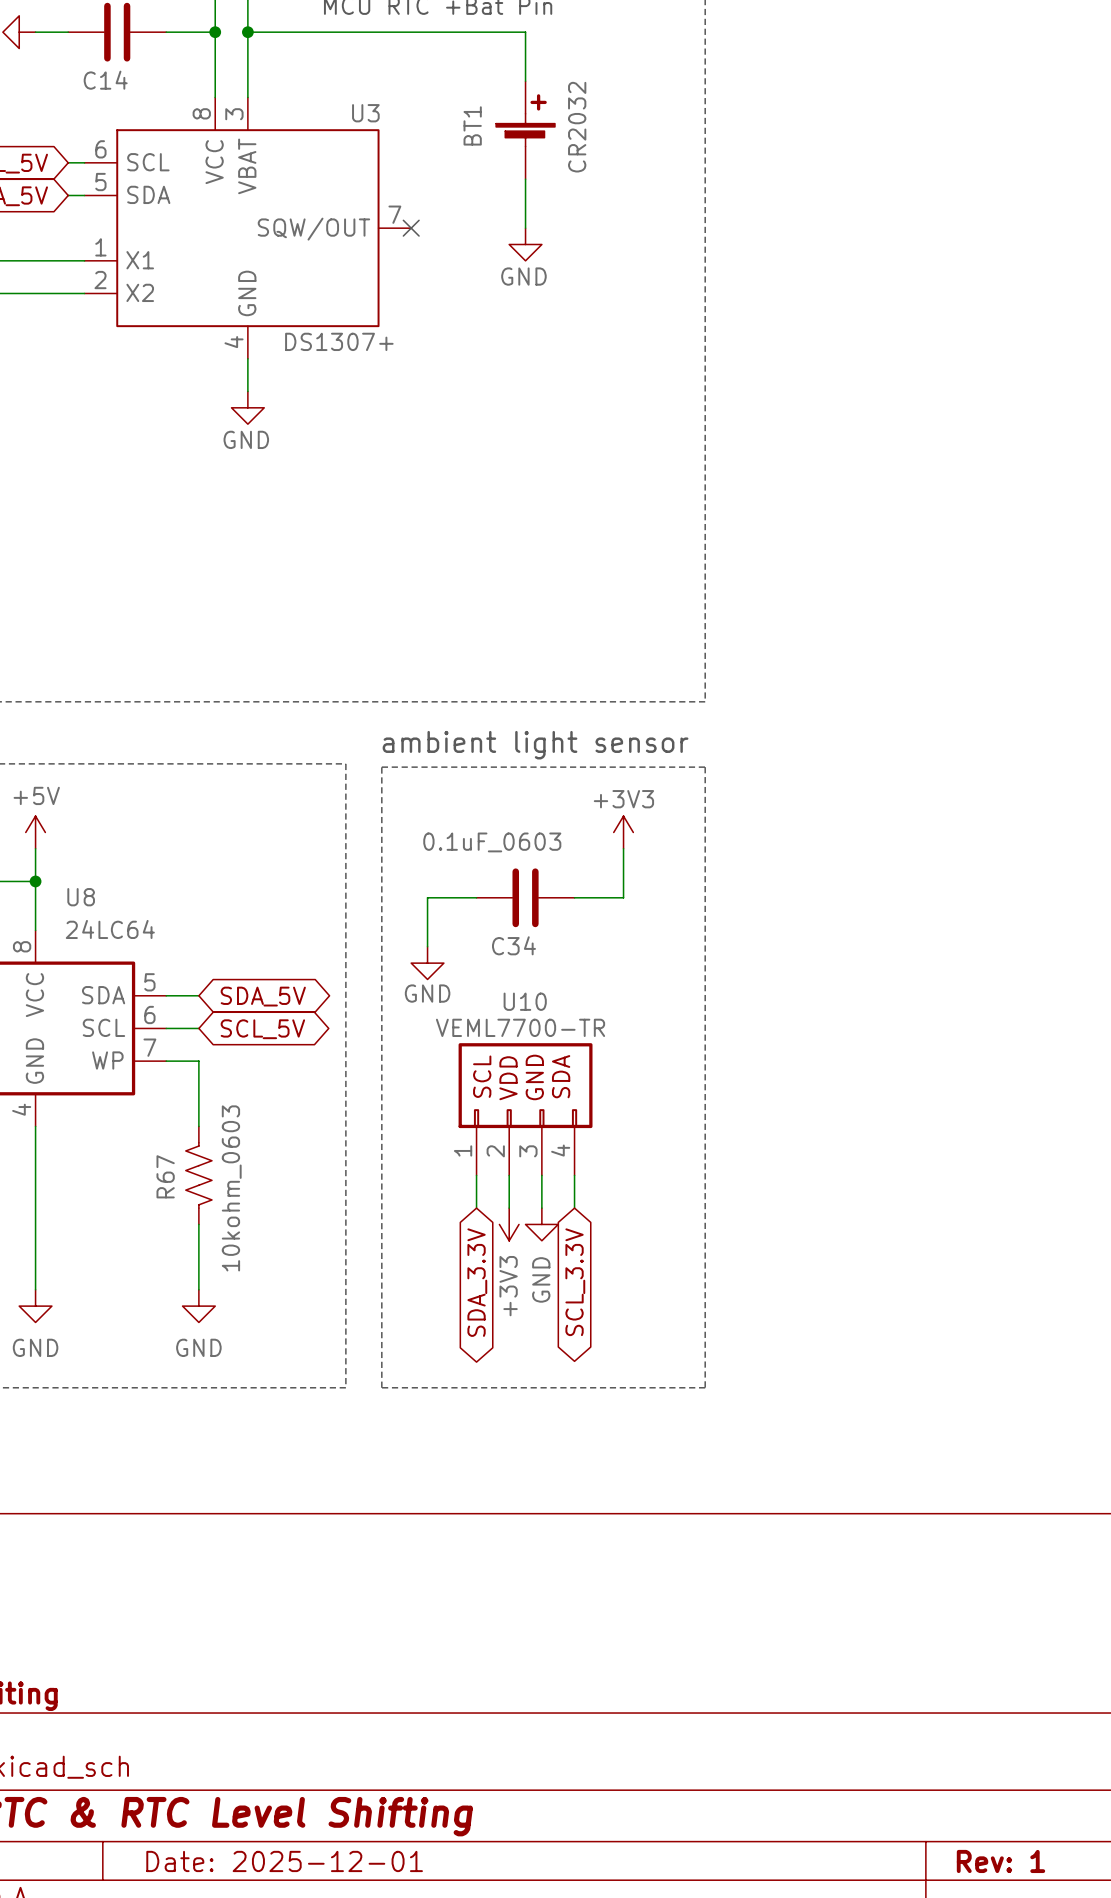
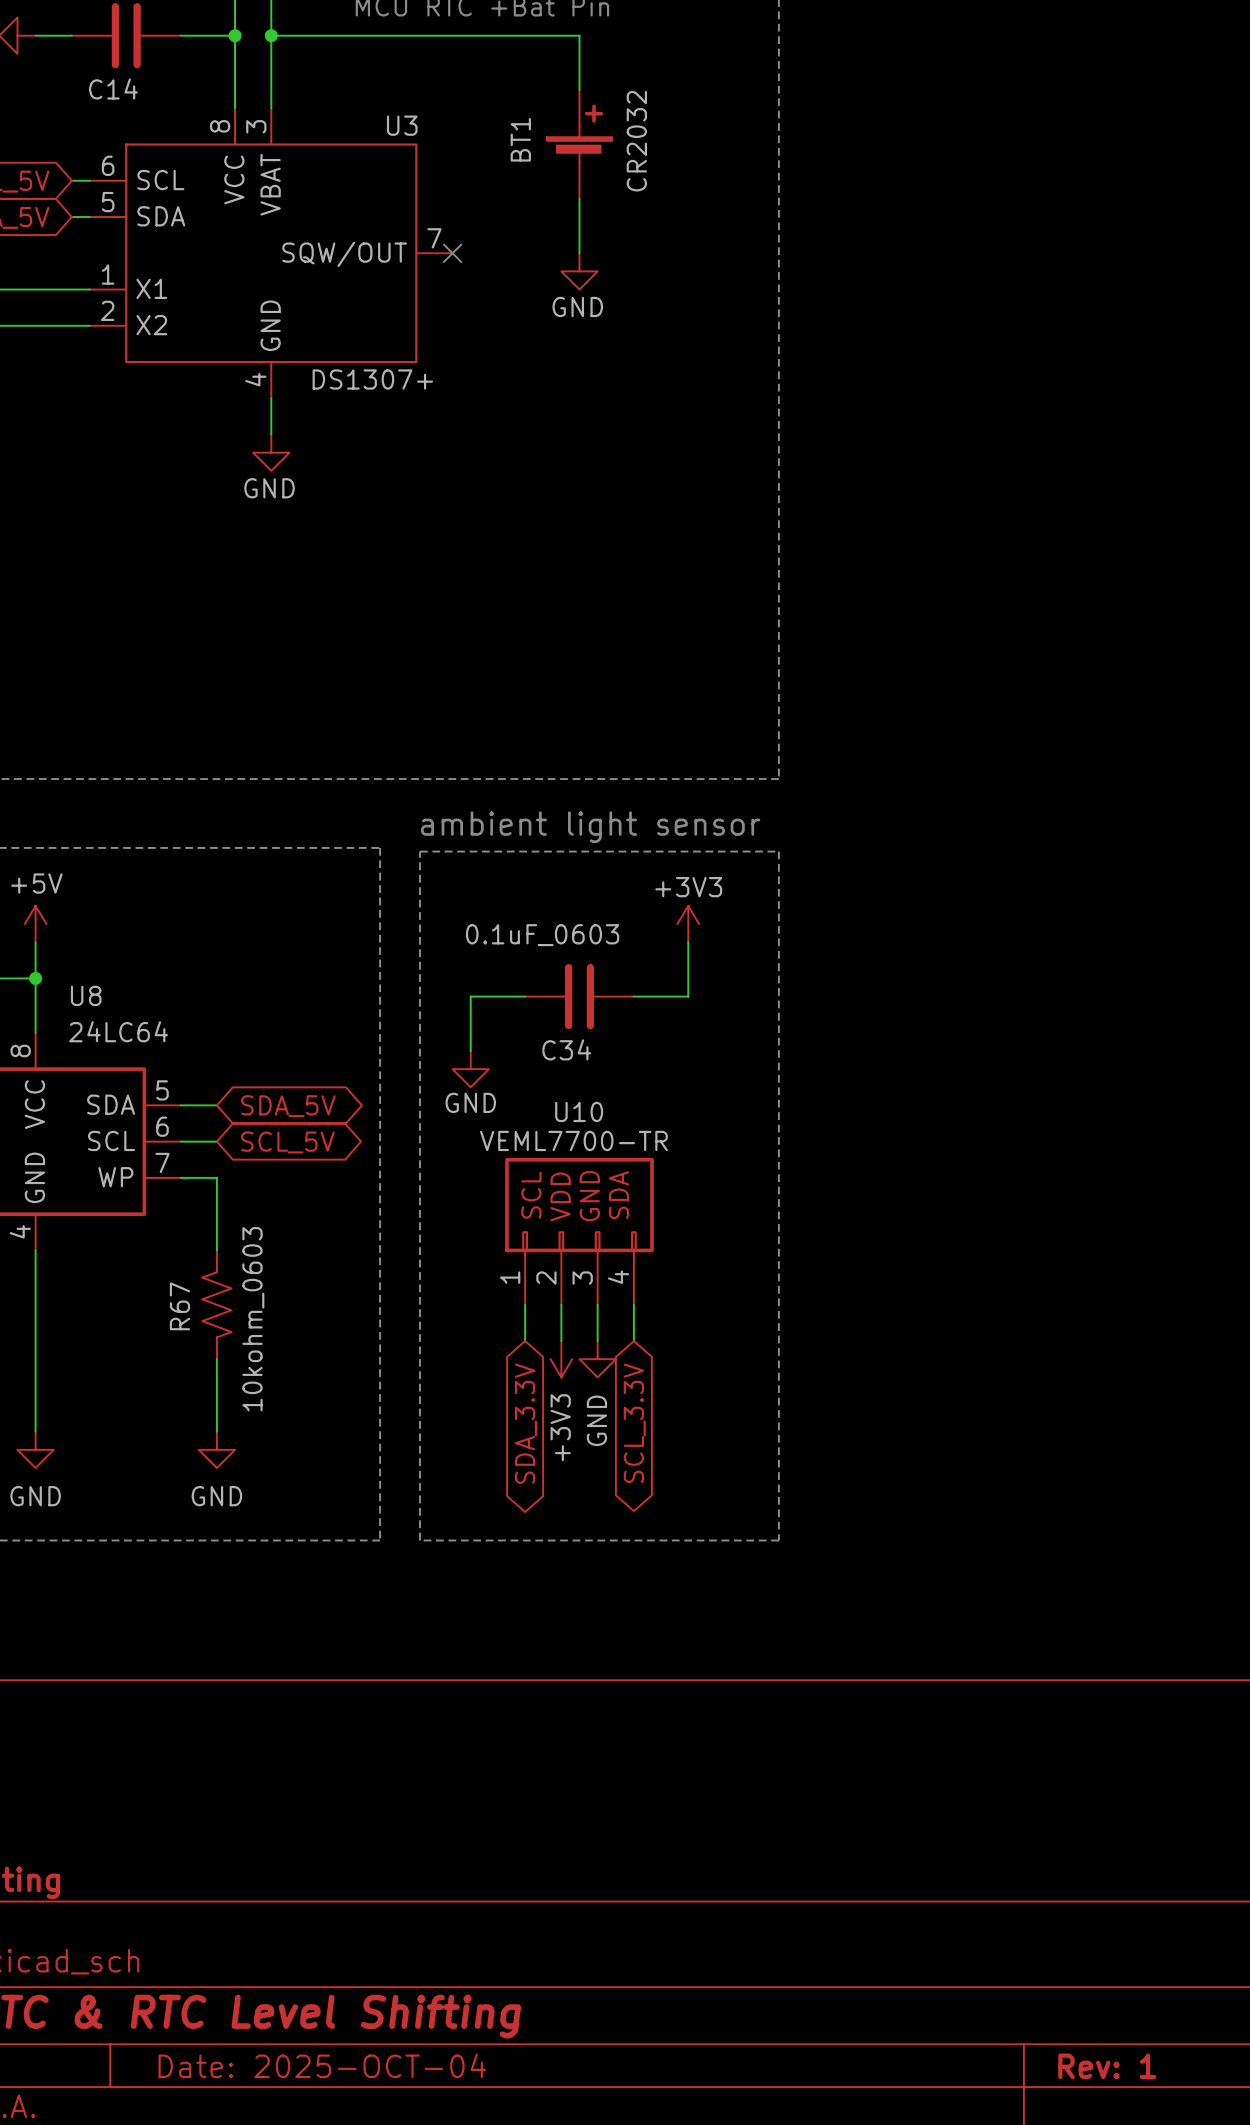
title block: Date: 2025-12-01 (284, 1861) -> Date: 2025-OCT-04 (322, 2065)

